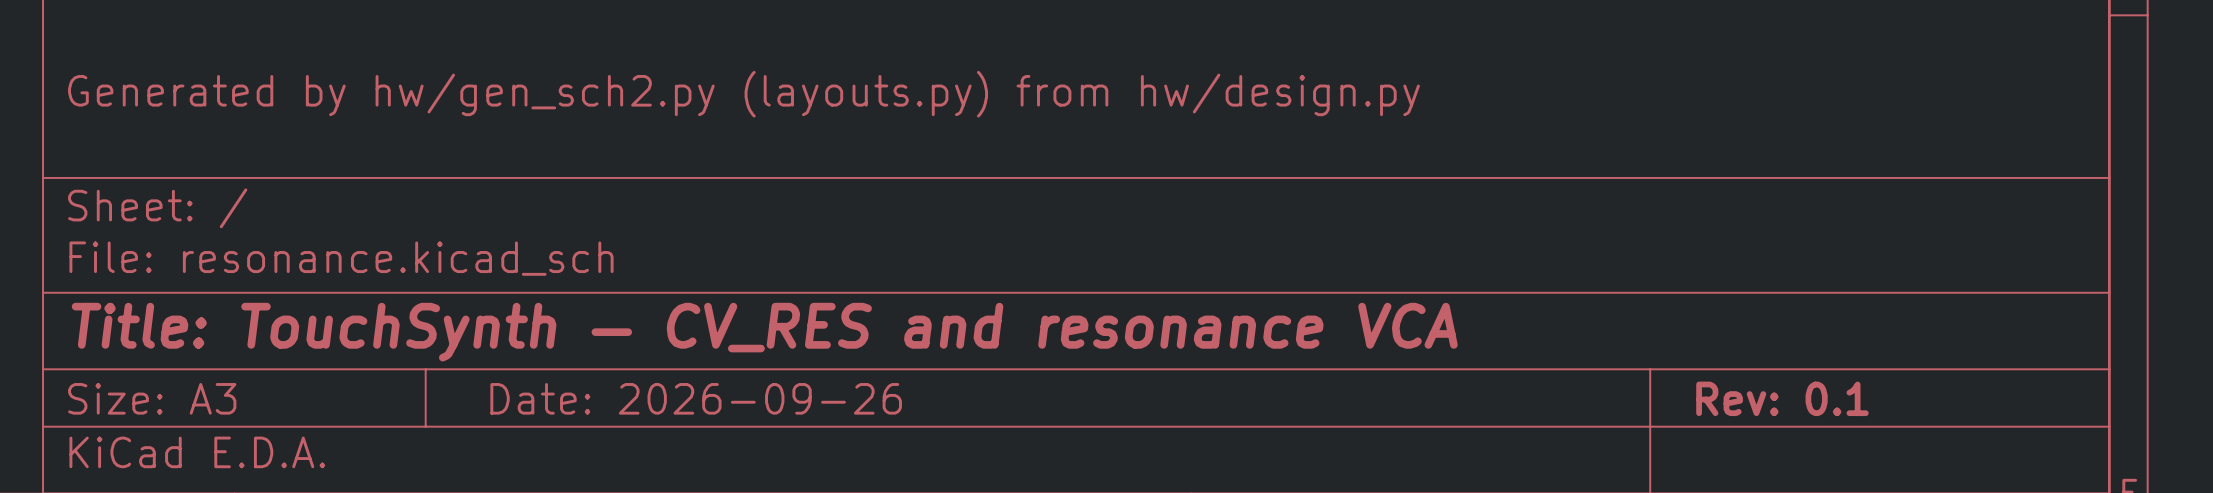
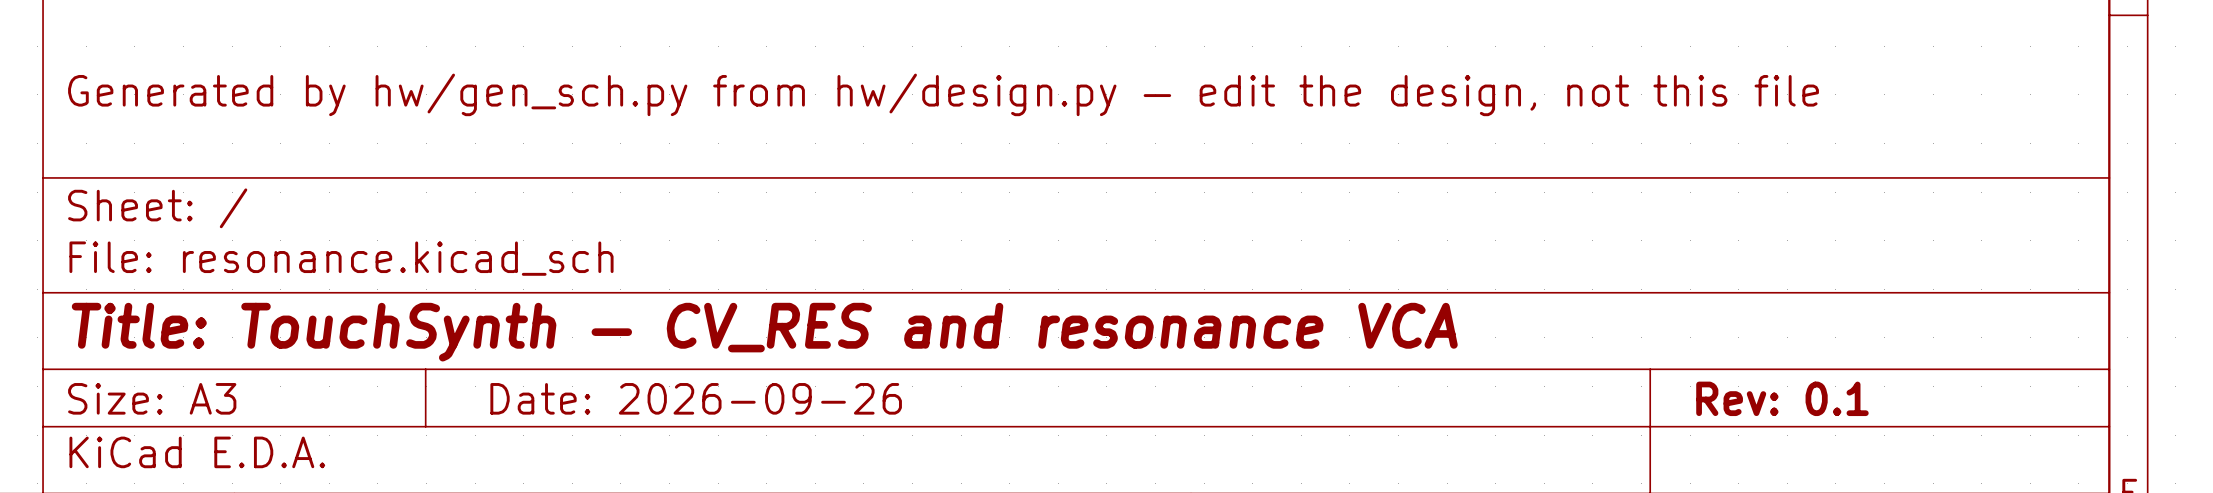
title block: Generated by hw/gen_sch2.py (layouts.py) from hw/design.py (743, 94) -> Generated by hw/gen_sch.py from hw/design.py — edit the design, not this file (943, 94)

